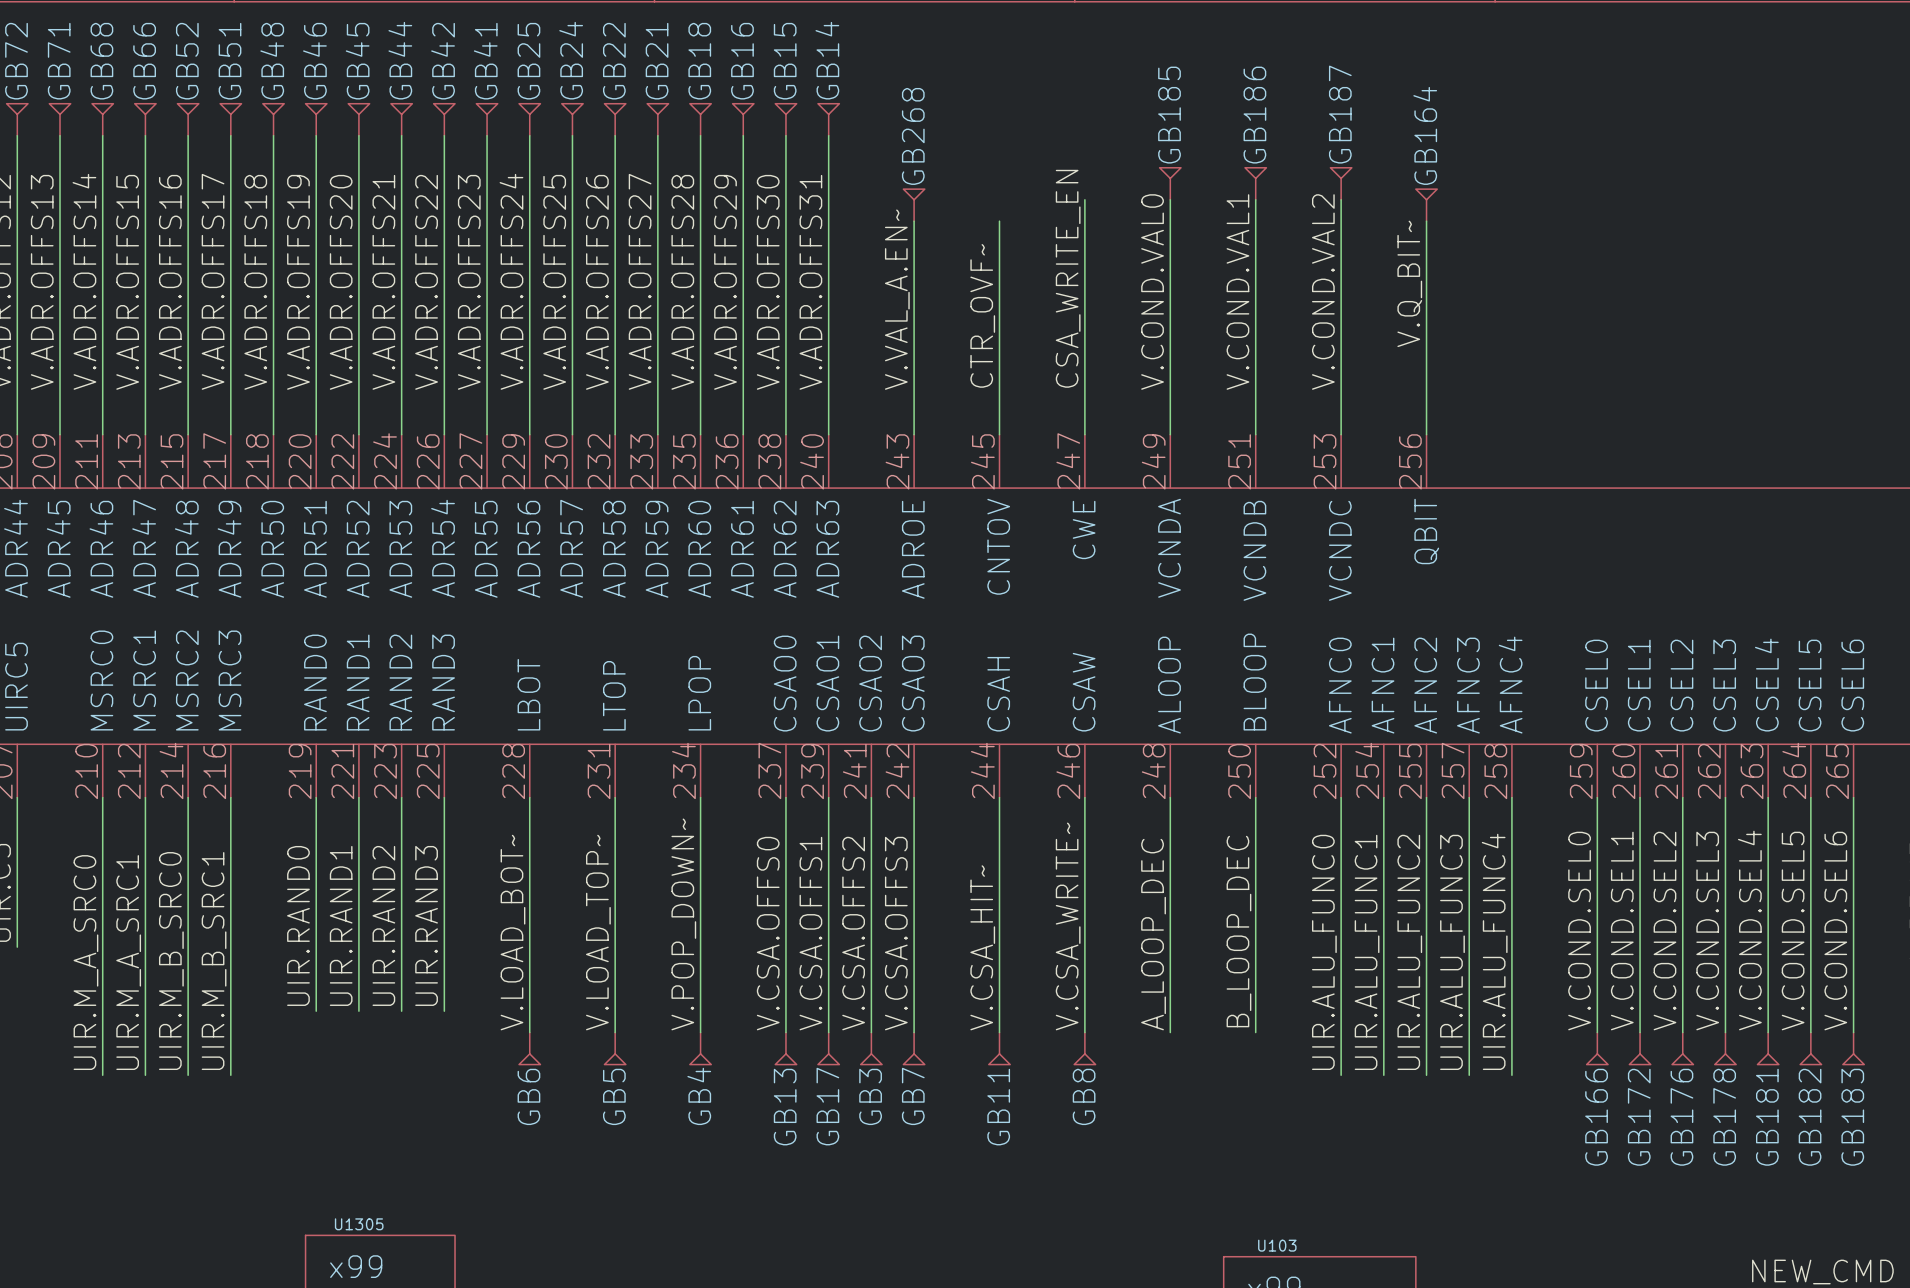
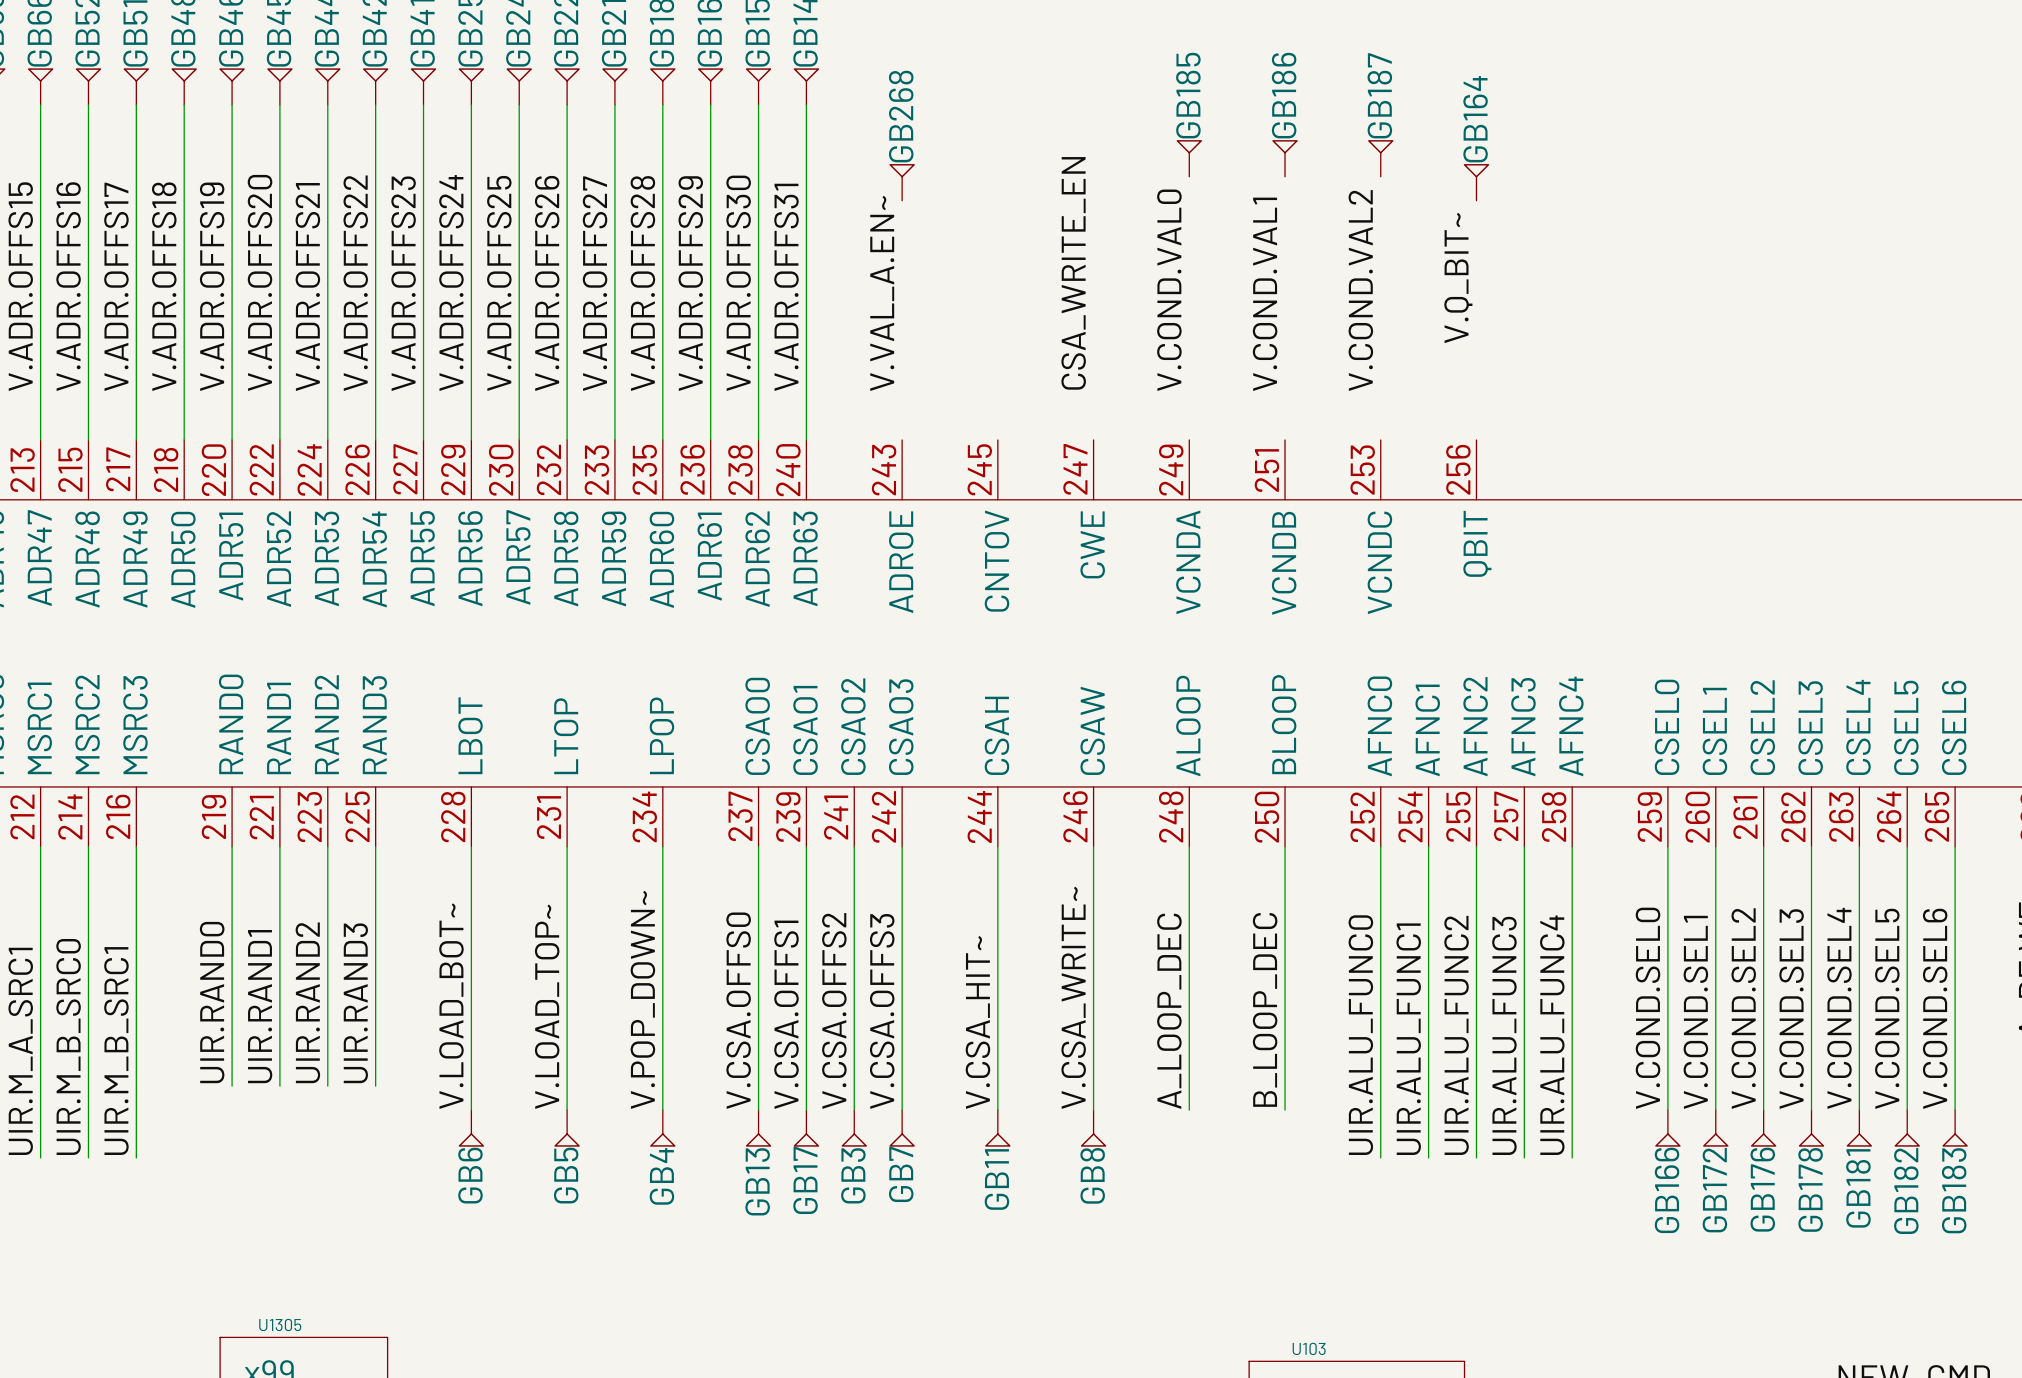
wire: (1084, 199) (1084, 434) -> none
wire: (1170, 199) (1170, 434) -> none
wire: (1255, 199) (1255, 434) -> none
wire: (1341, 199) (1341, 434) -> none
wire: (914, 221) (914, 434) -> none
wire: (999, 221) (999, 434) -> none
wire: (1426, 221) (1426, 434) -> none
label: CTR_OVF~ (982, 315) -> none

